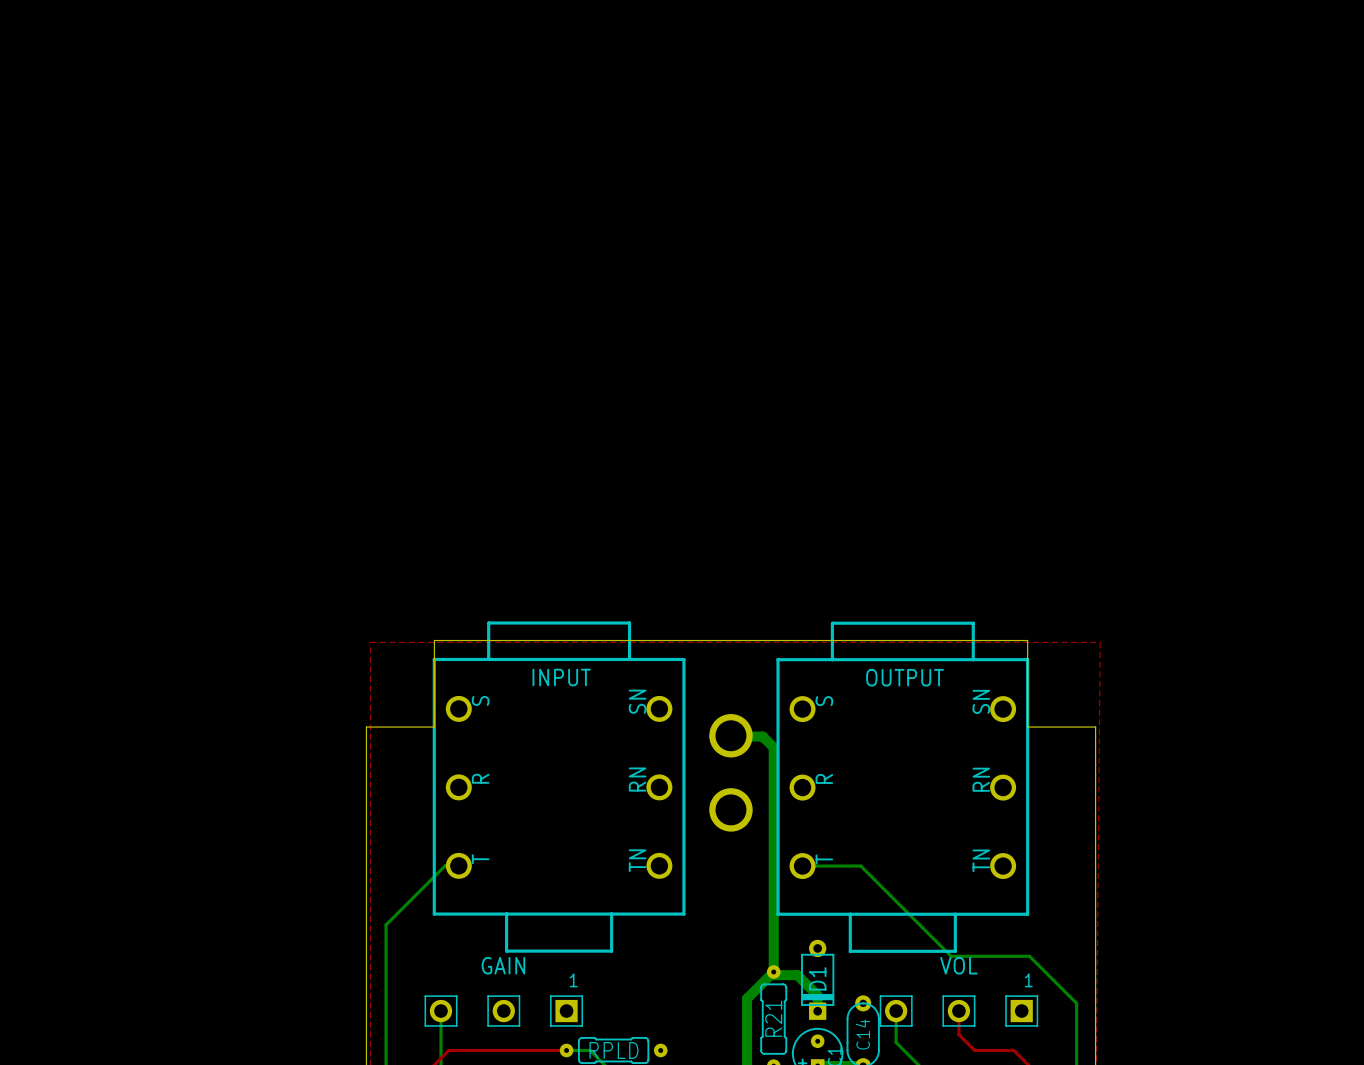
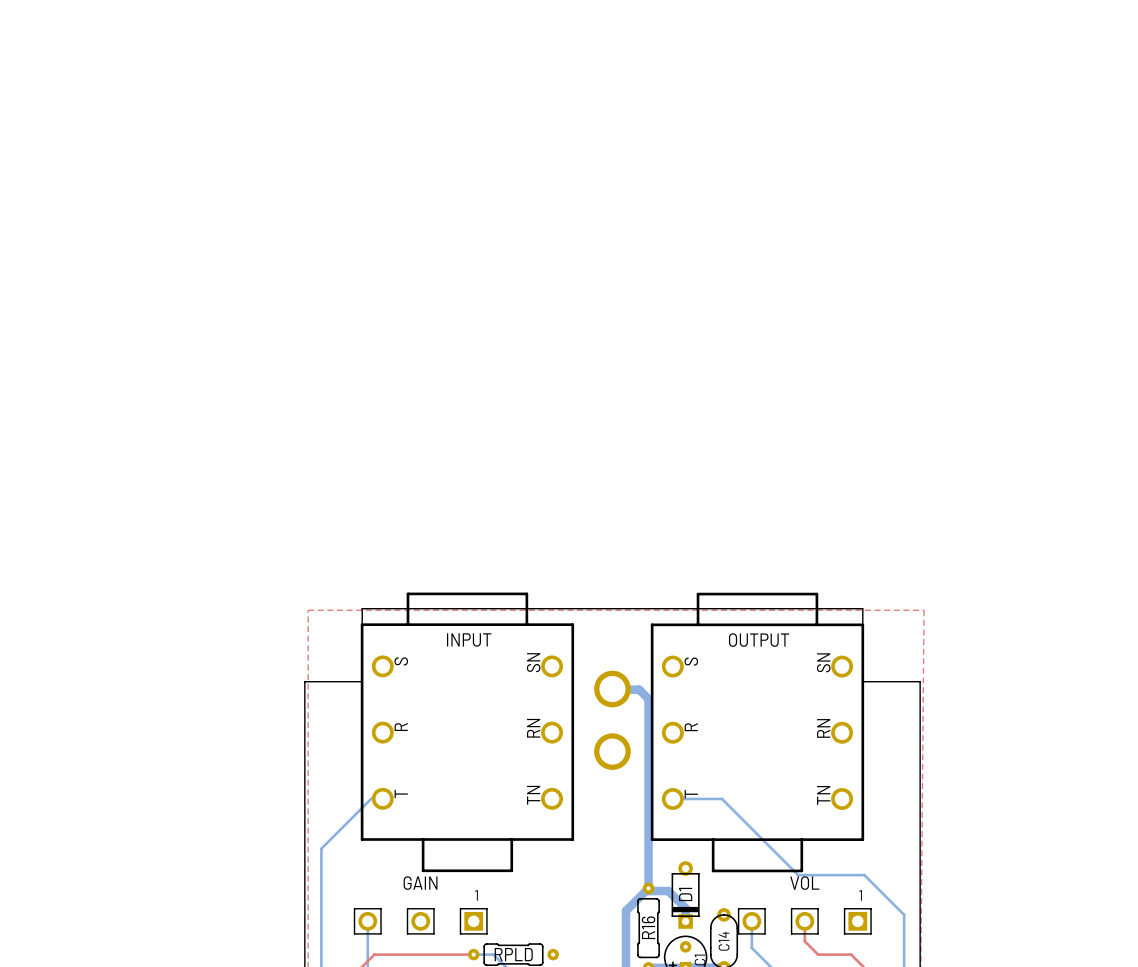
R21 name: R21 (773, 1018) -> R16 (648, 927)

